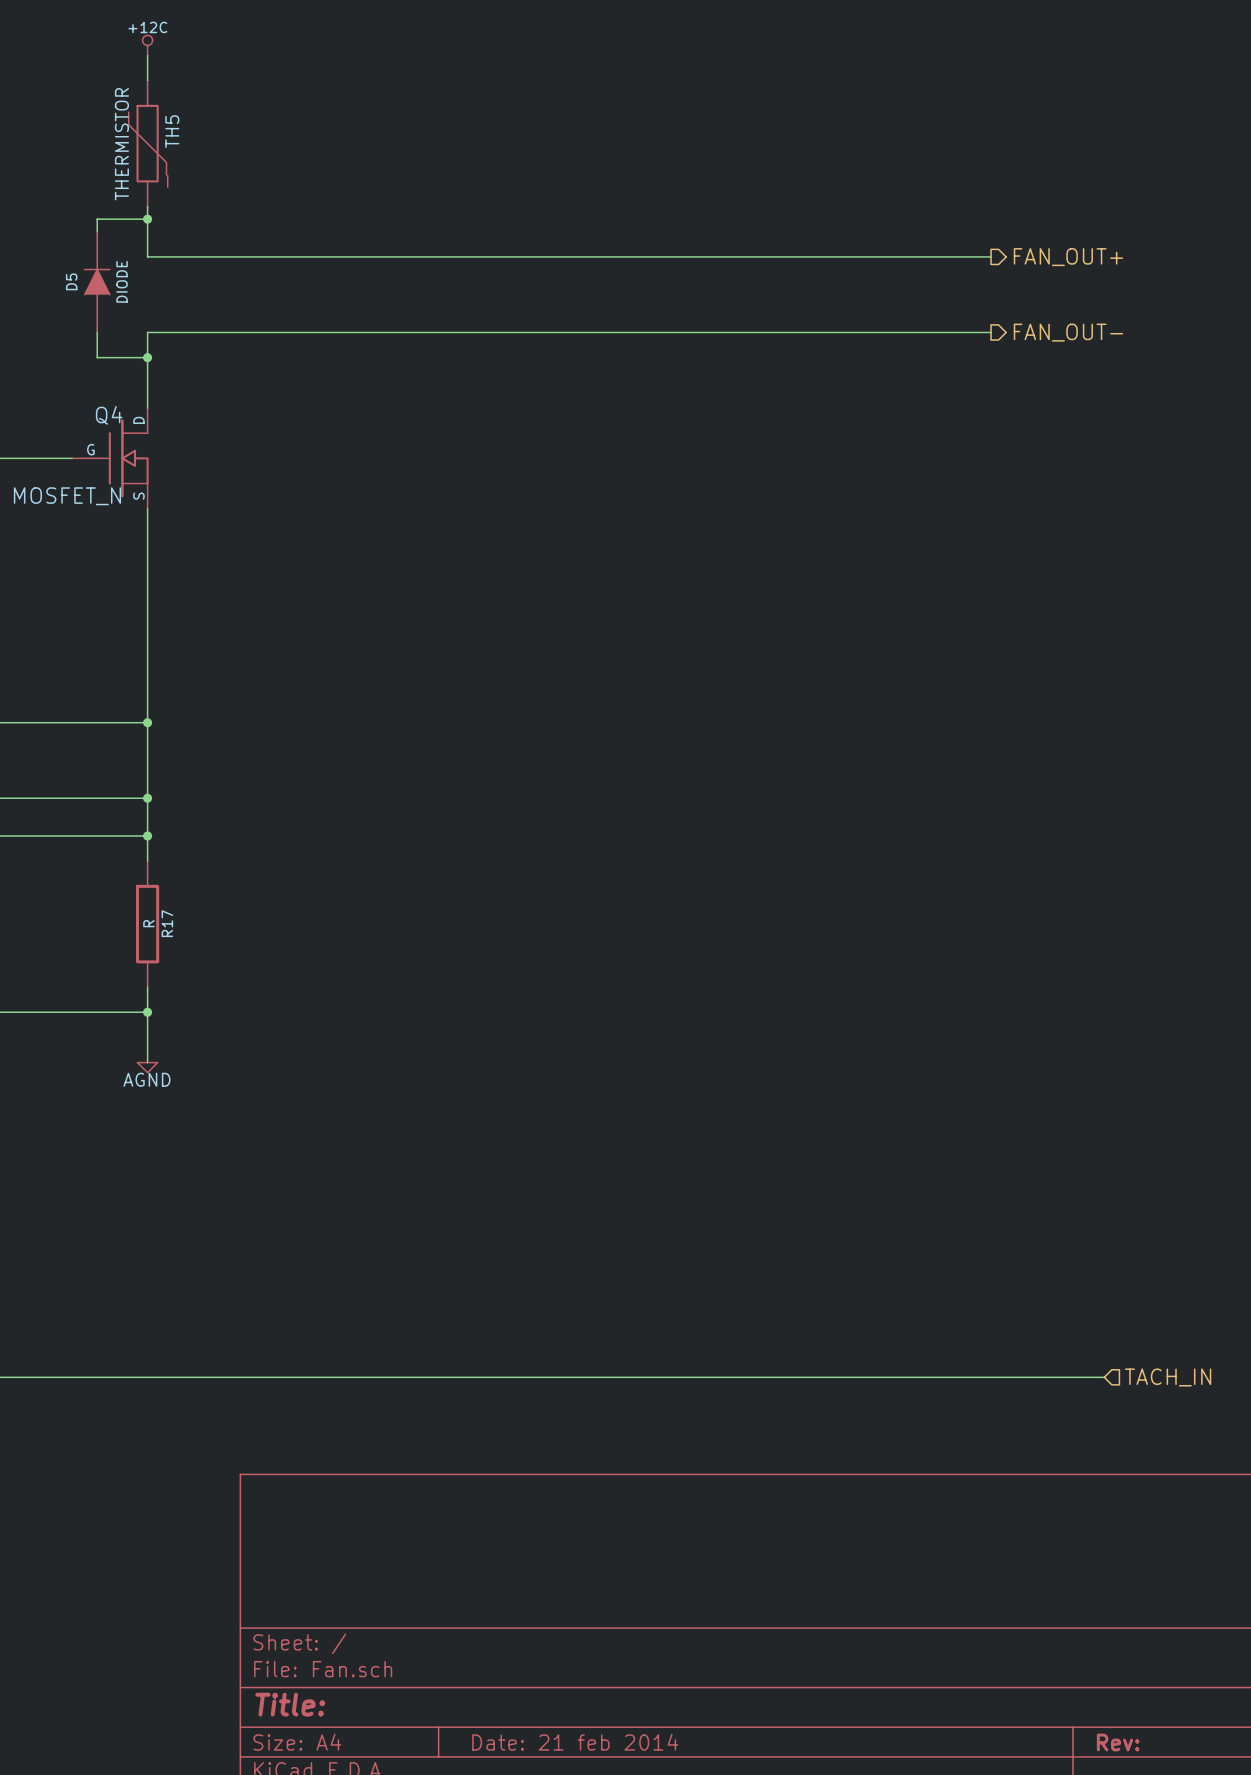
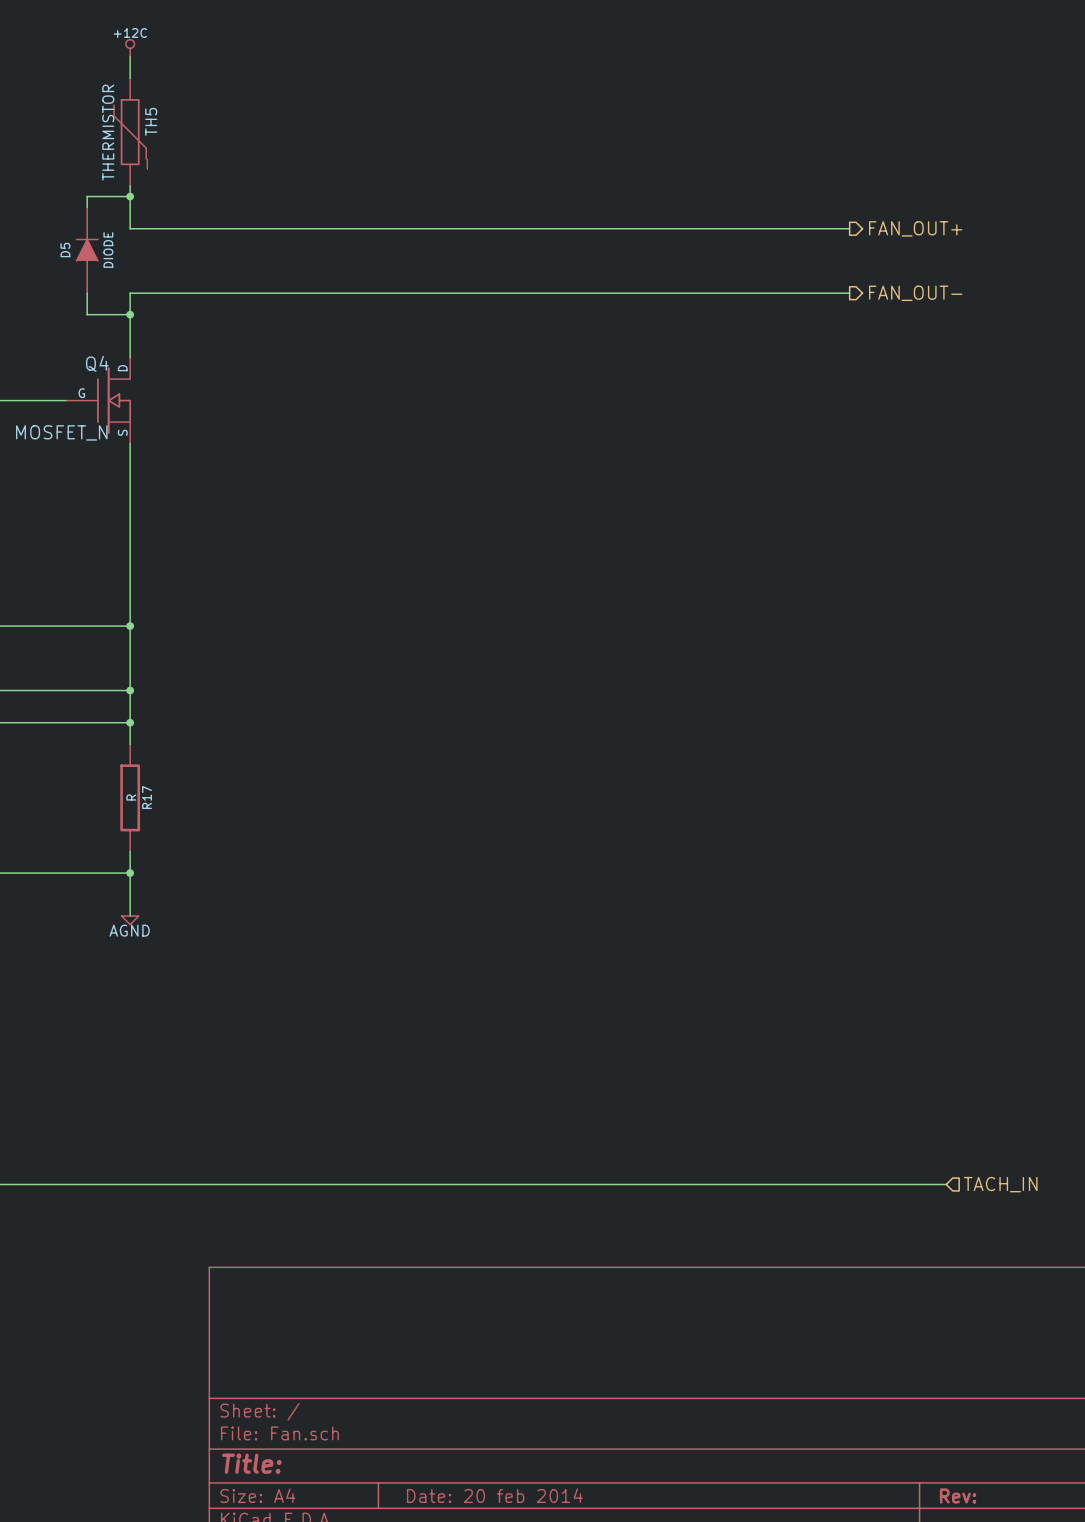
title block: Date: 21 feb 2014 (575, 1742) -> Date: 20 feb 2014 (494, 1495)

